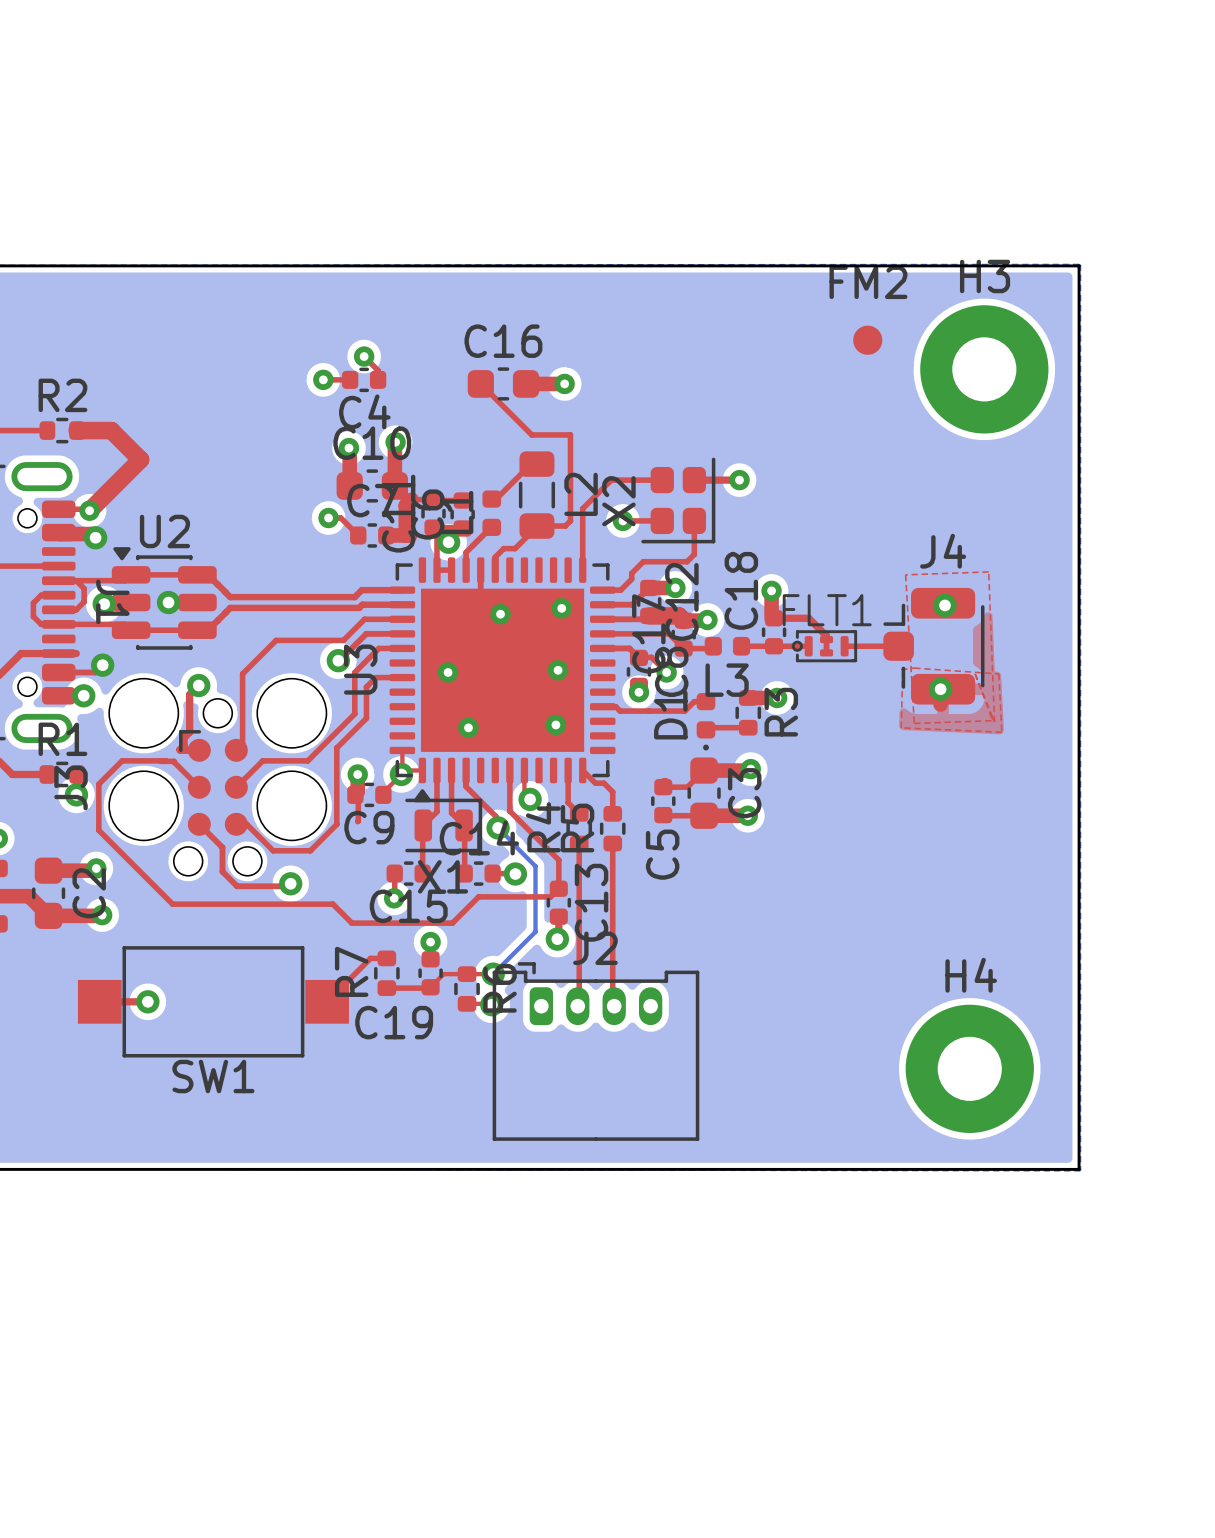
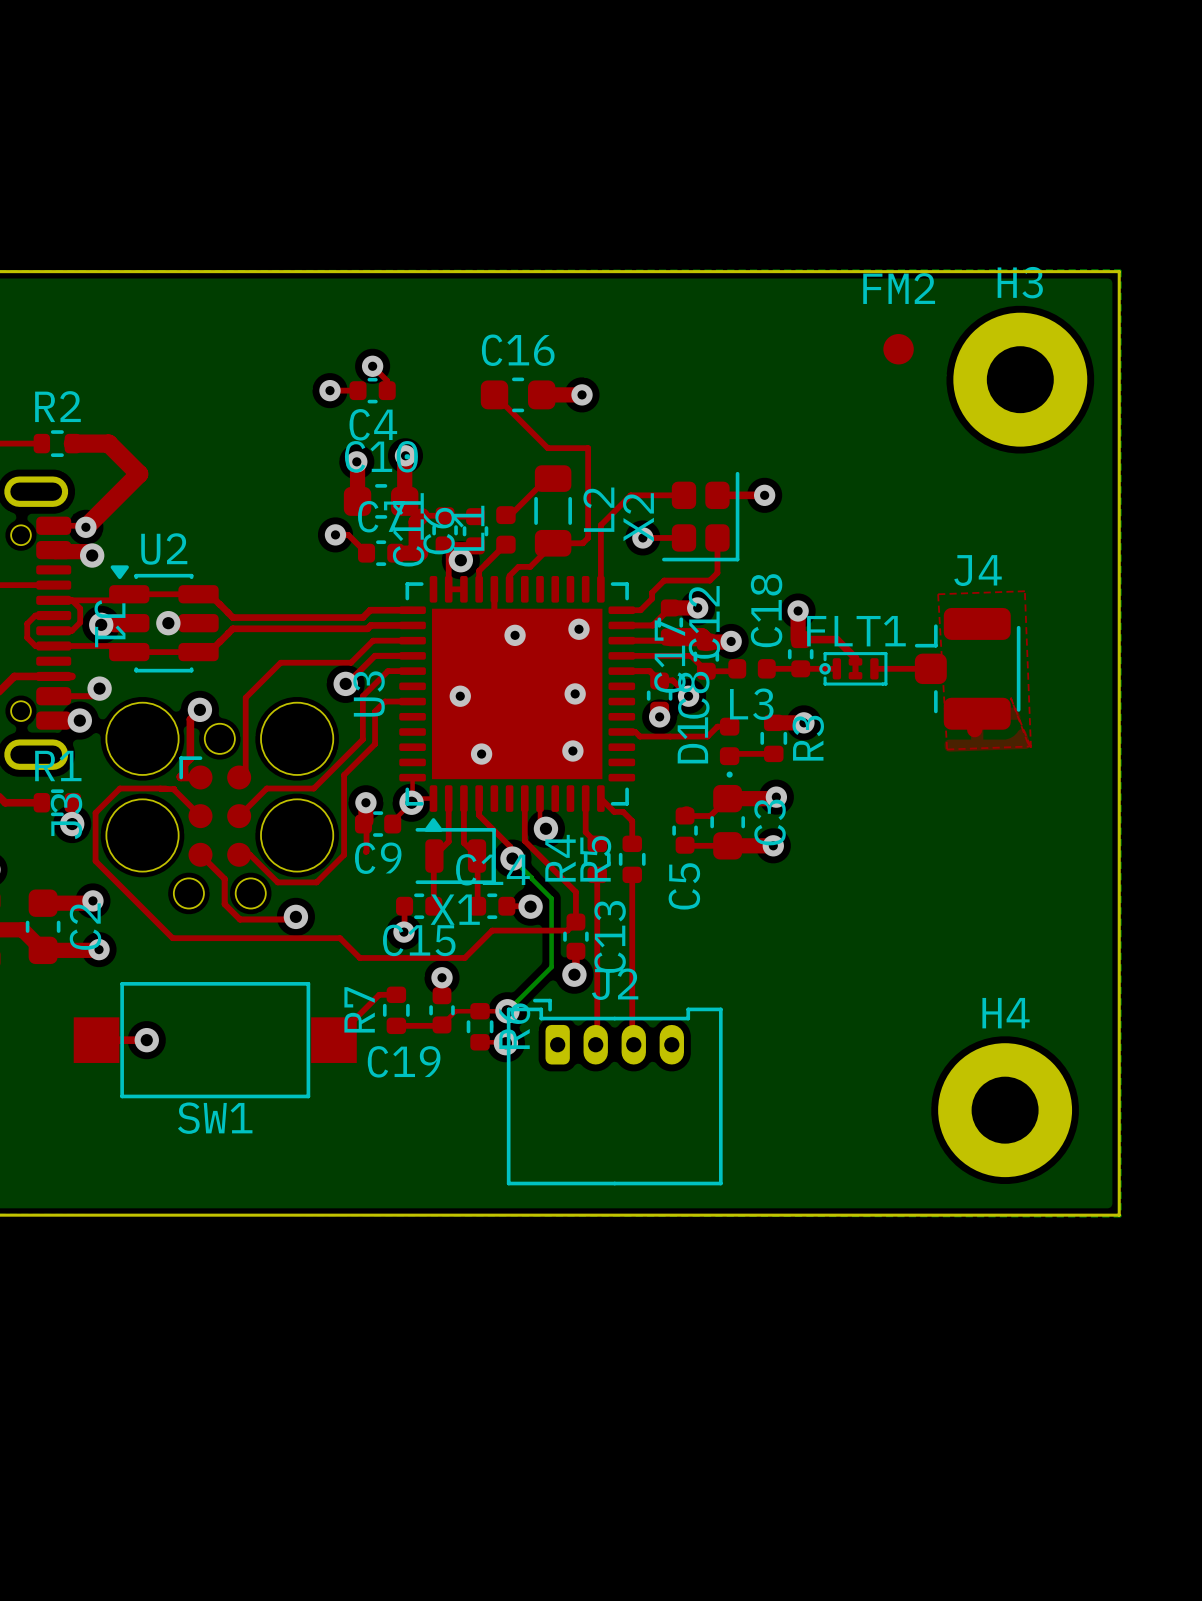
via: (944, 605) -> none
top zone outline: (914, 668) (901, 669) (901, 727) (1001, 732) (998, 673) (914, 668) -> none
via: (940, 689) -> none

